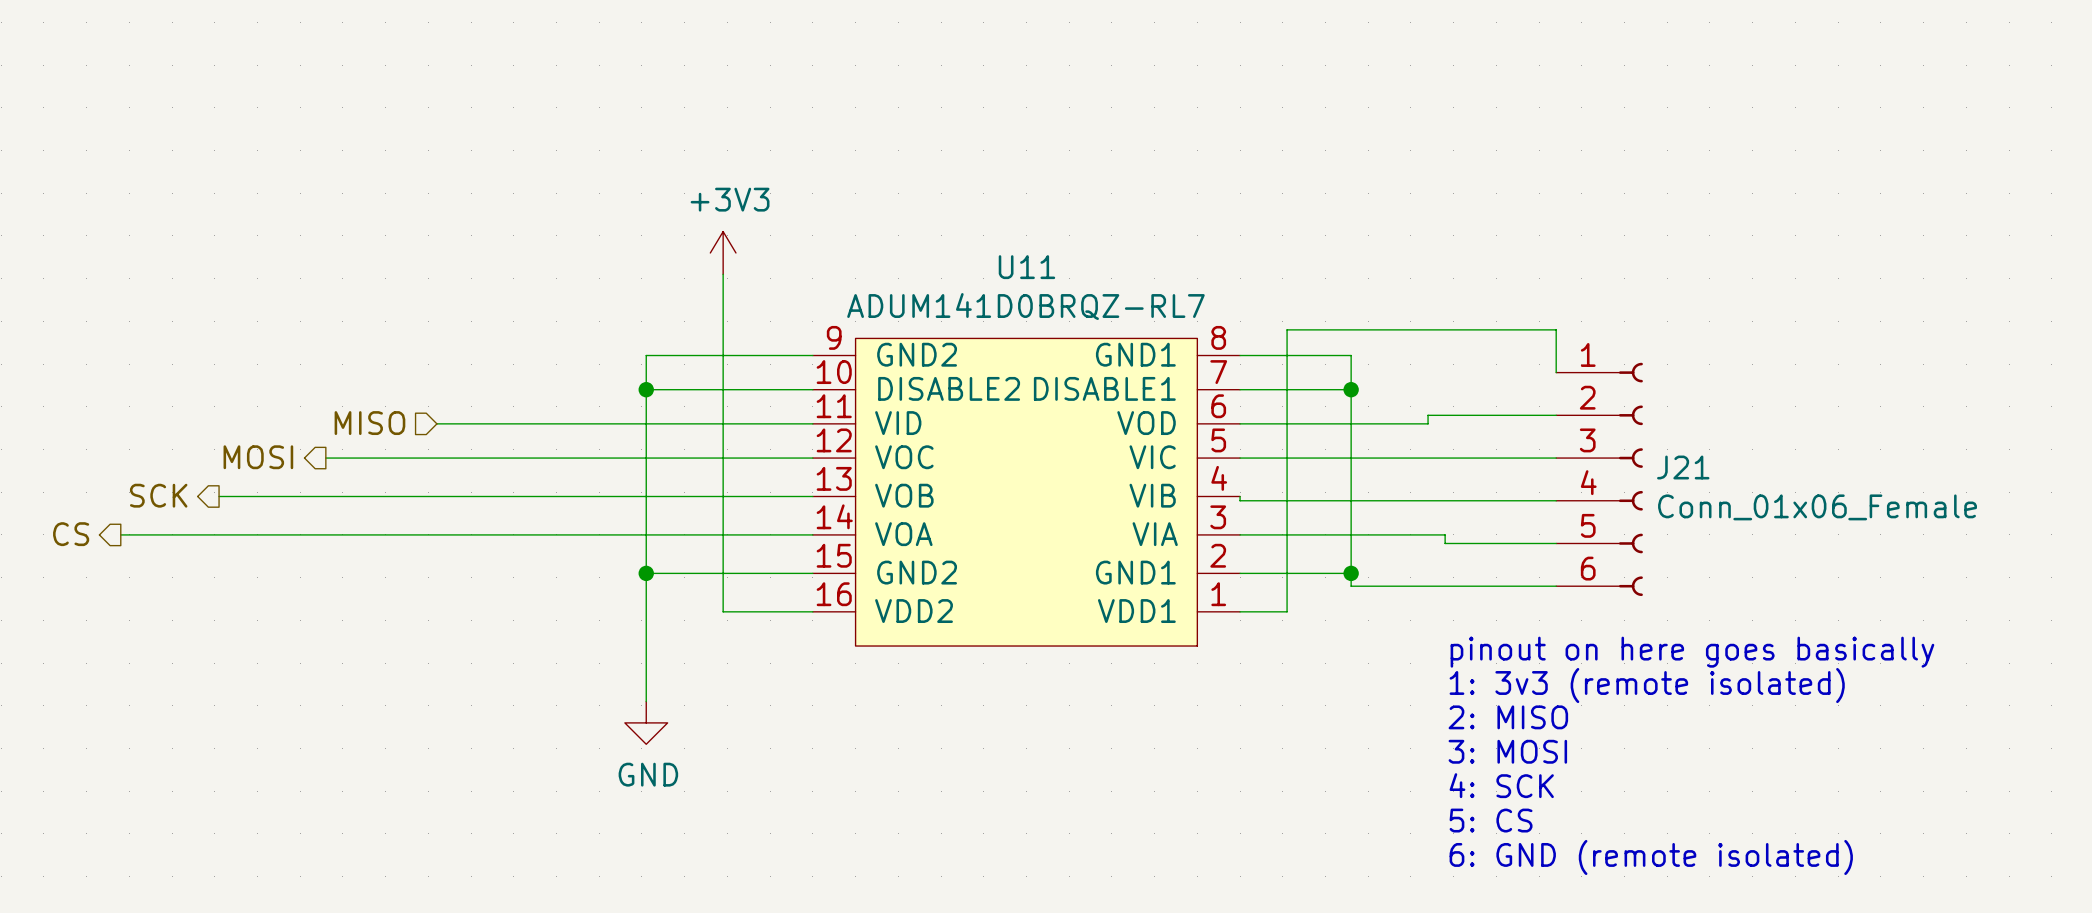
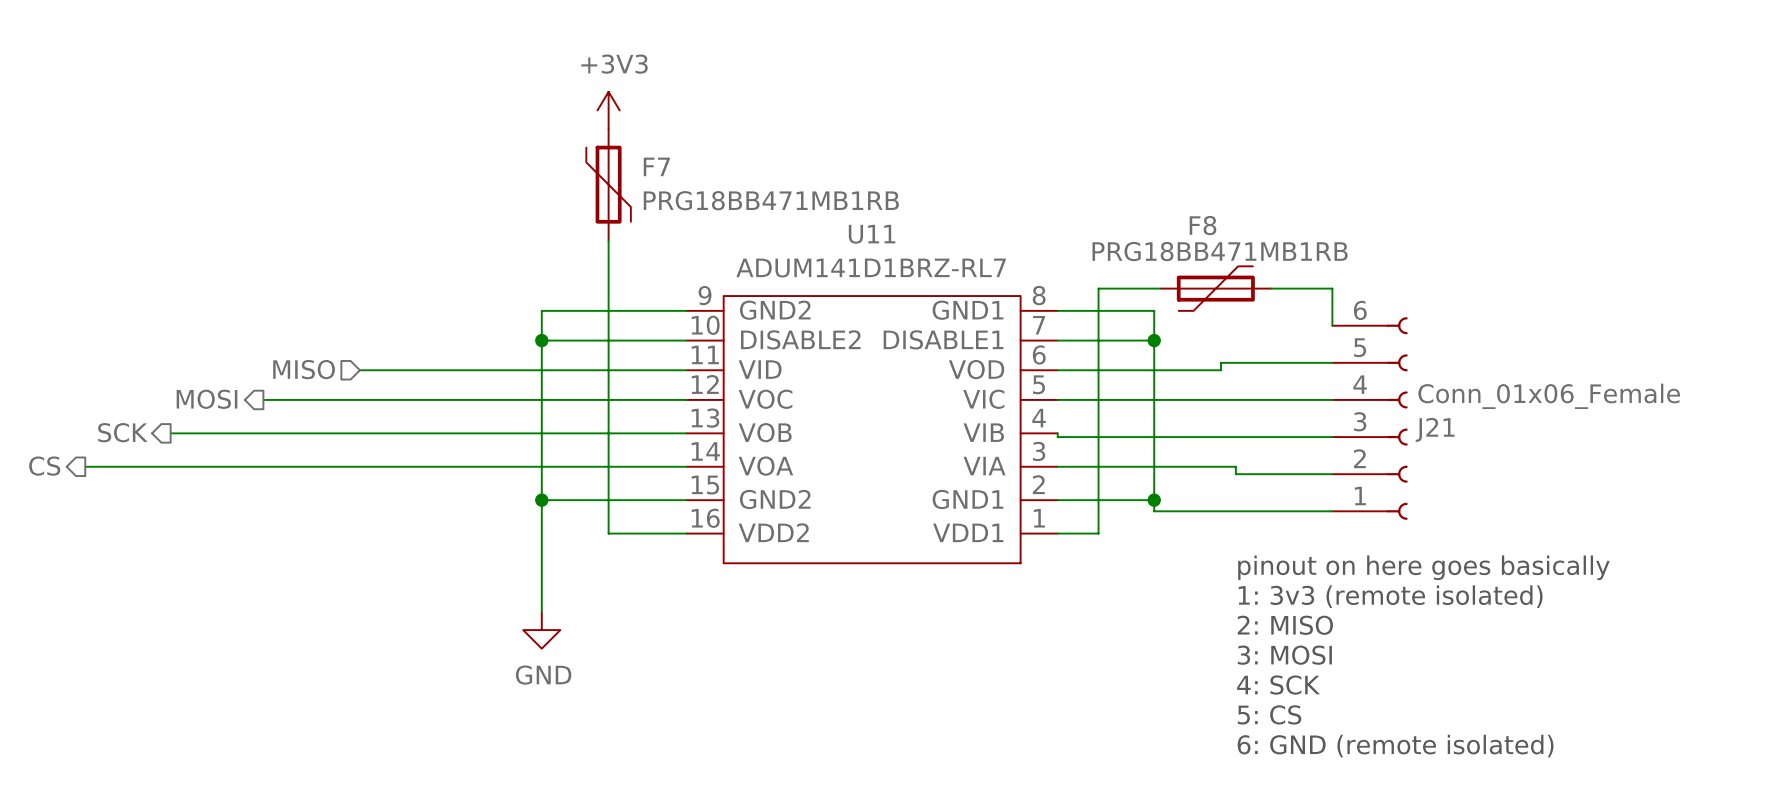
F7: none -> PRG18BB471MB1RB (608, 184)
power symbol position: +3V3 (723, 252) -> +3V3 (608, 110)
U11 value: ADUM141D0BRQZ-RL7 (1025, 306) -> ADUM141D1BRZ-RL7 (871, 268)
F8: none -> PRG18BB471MB1RB (1215, 288)
J21 flip: as is (1630, 479) -> up-down (1397, 418)

